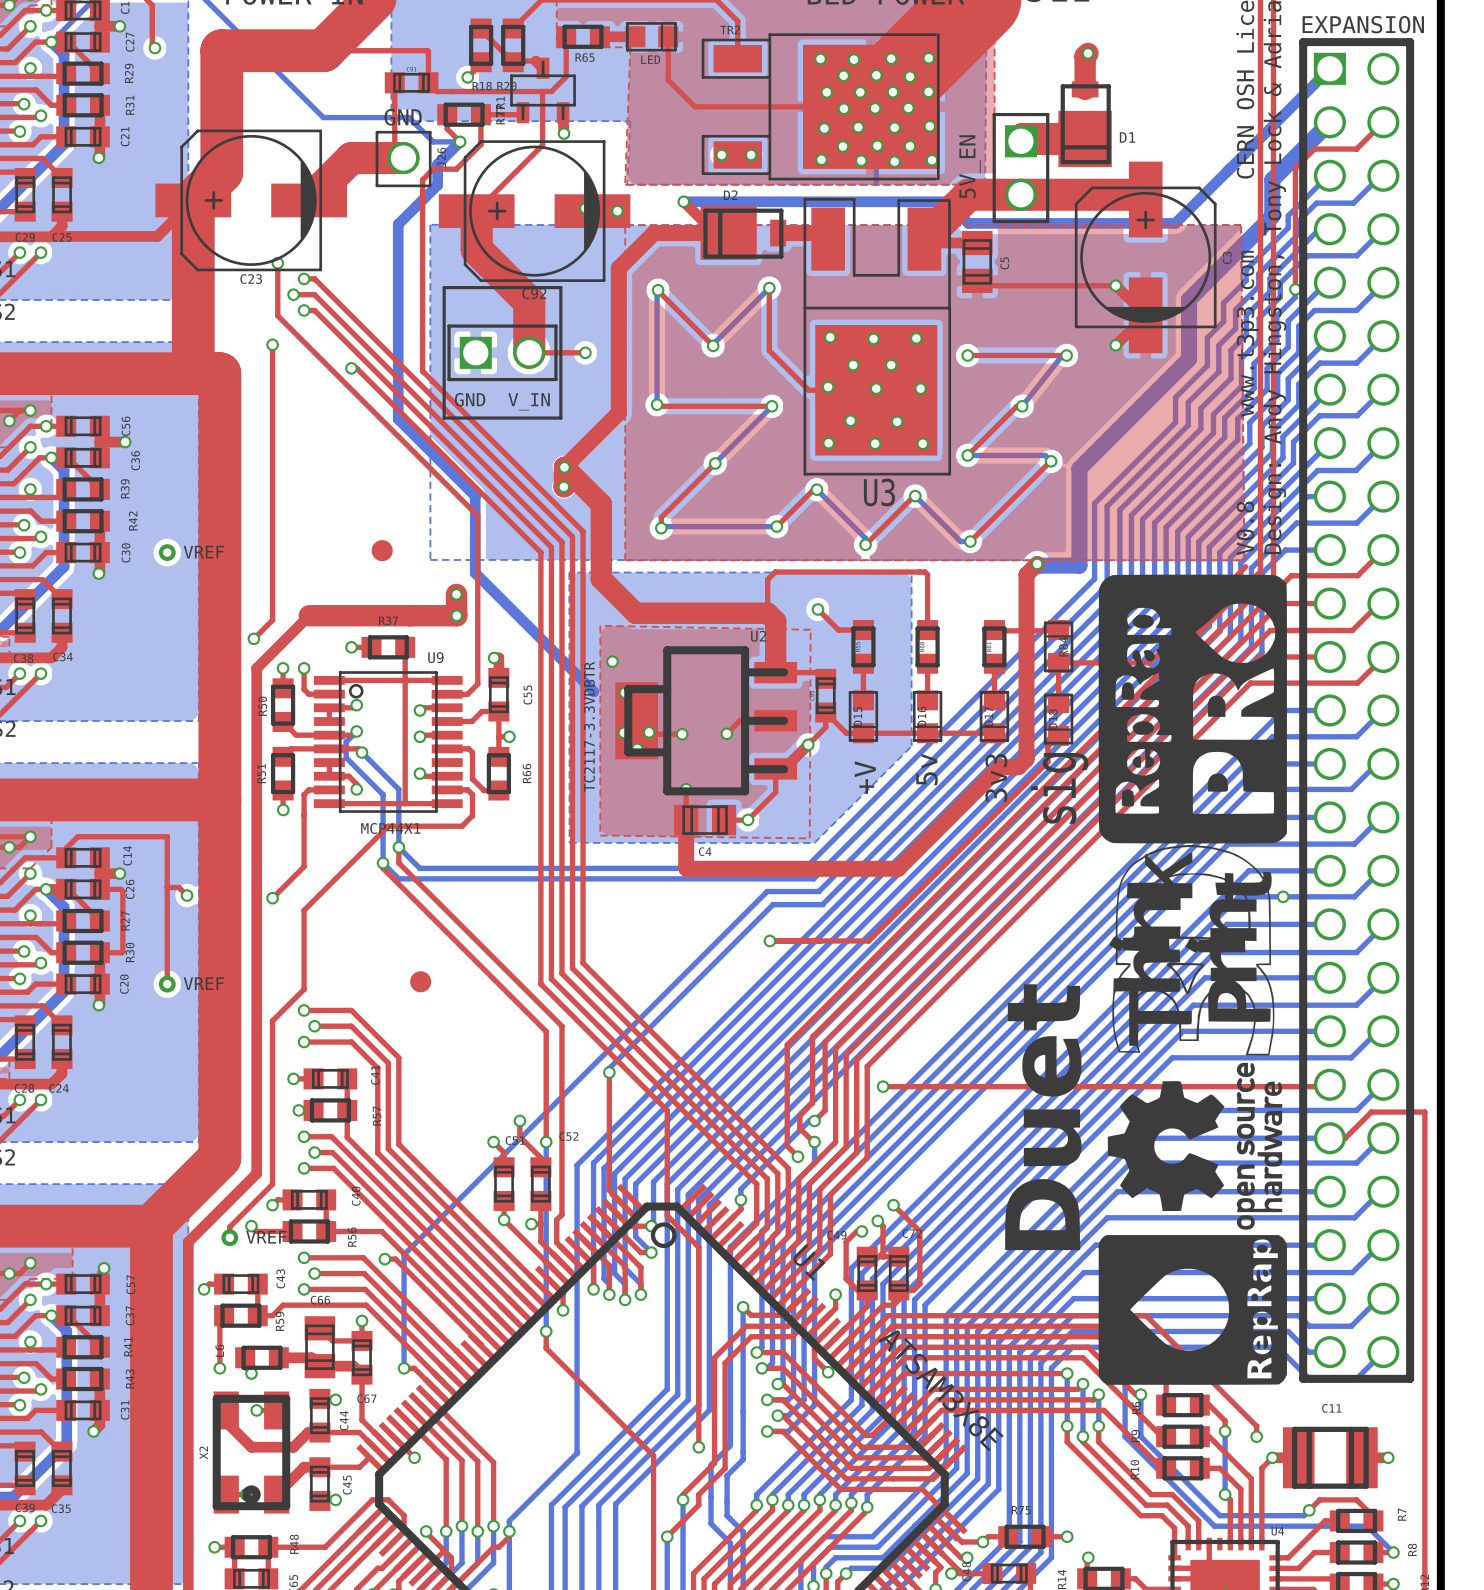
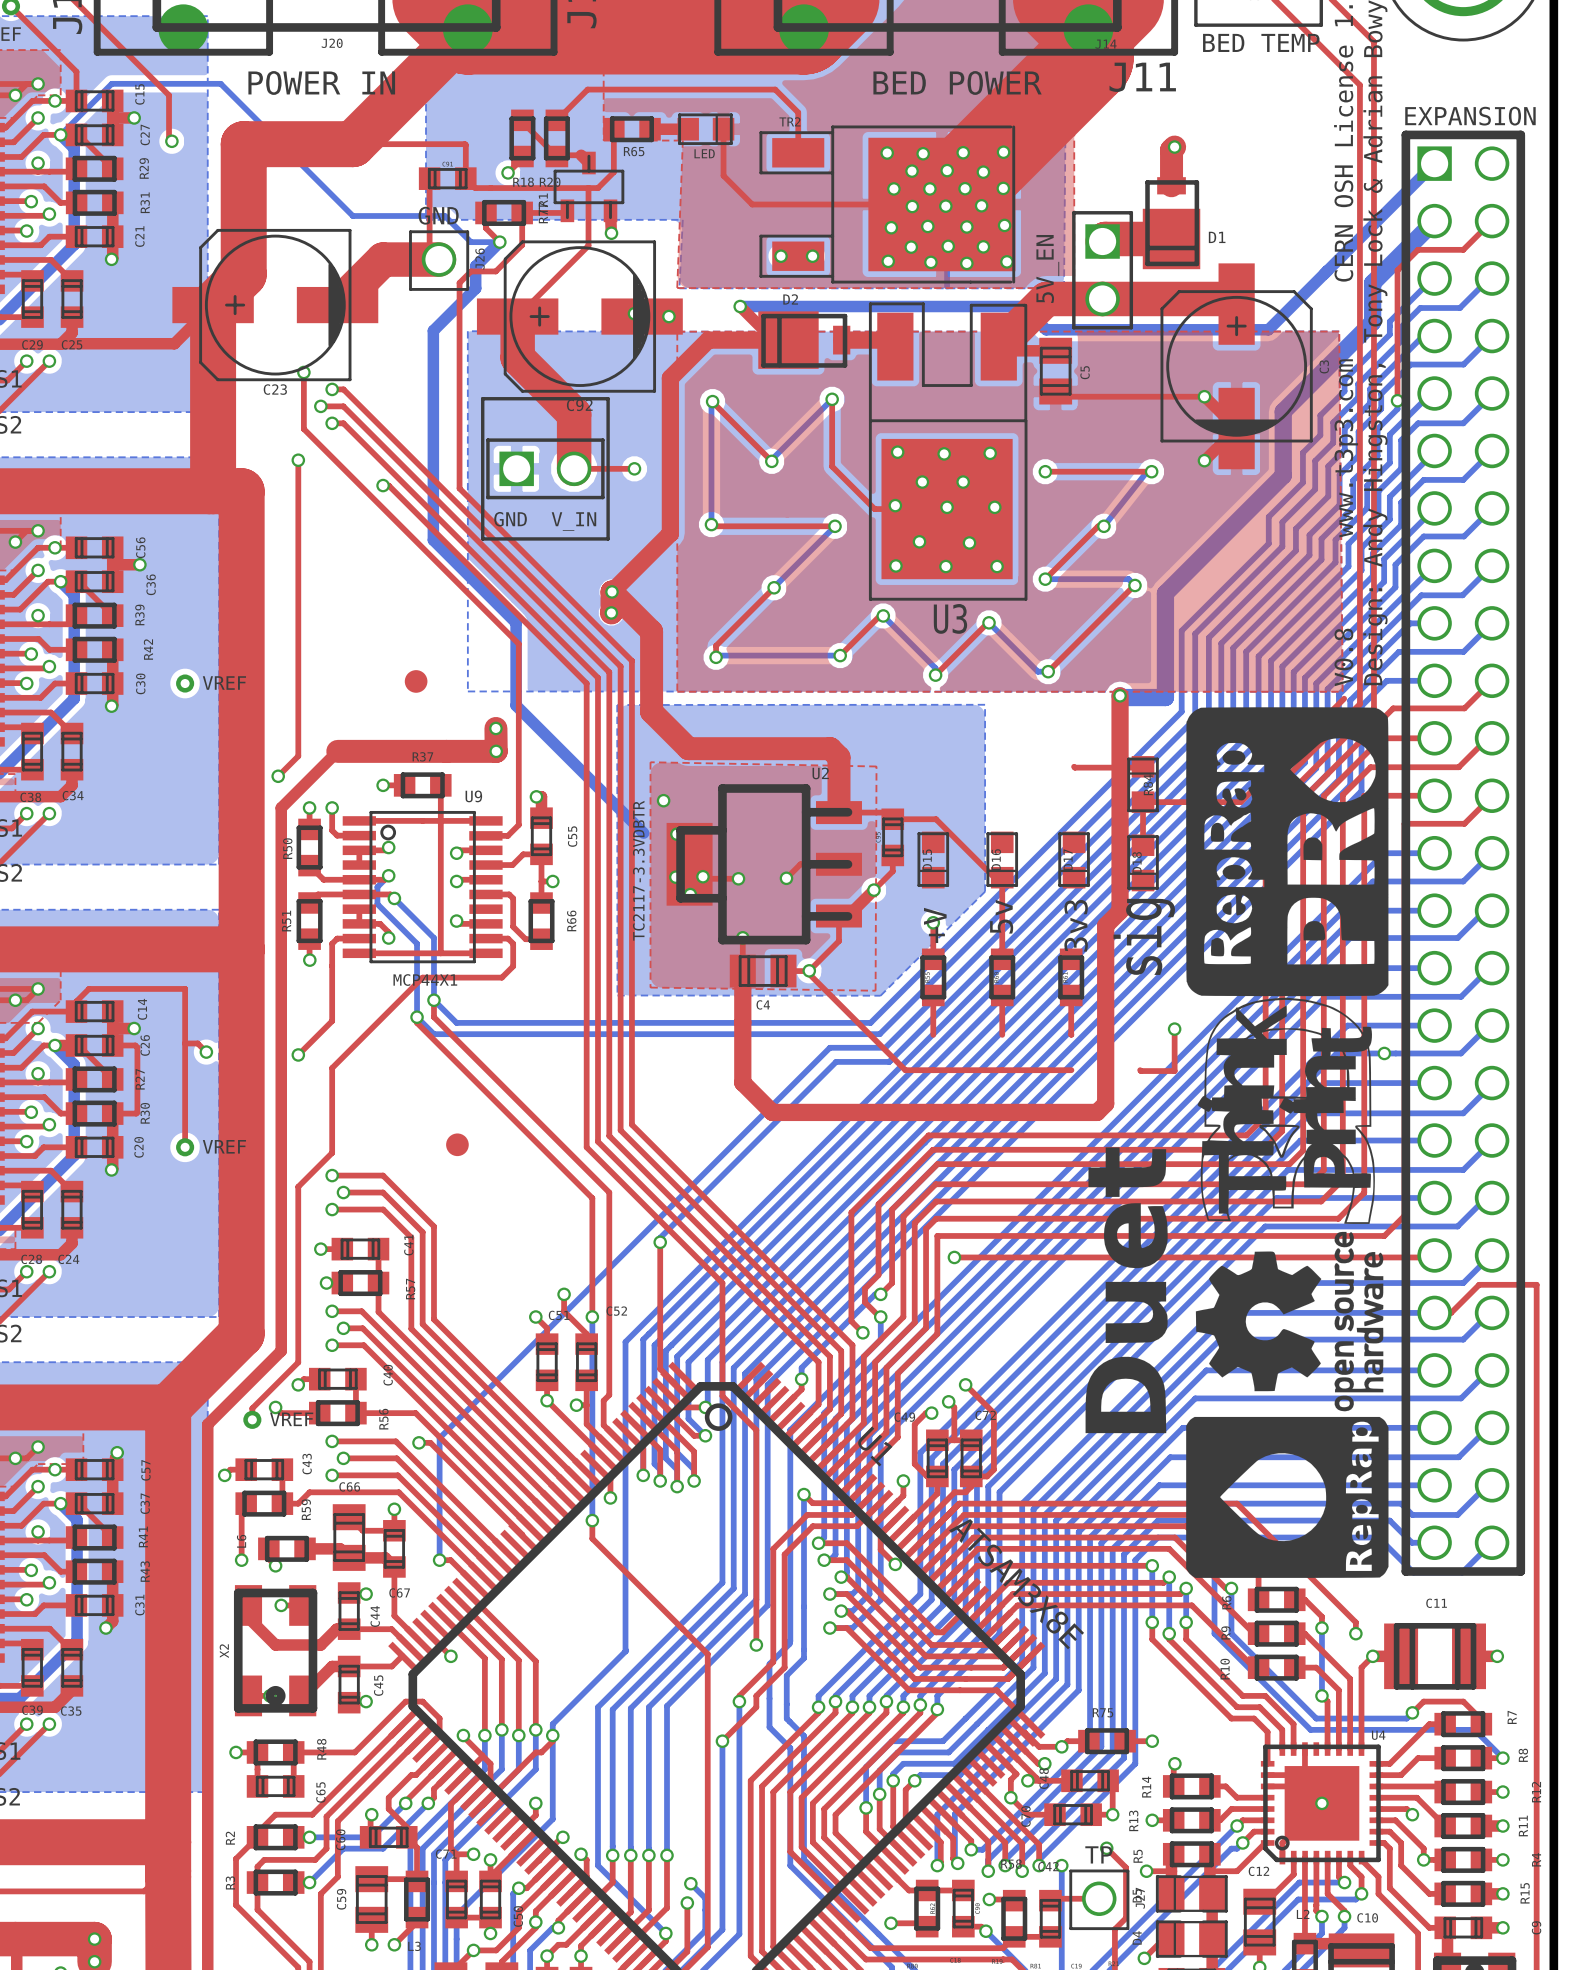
top track: (1037, 564) (1026, 574) (1026, 759) (1018, 767) (999, 767) (898, 868) (686, 867) -> (1120, 695) (1120, 911) (1105, 925) (1105, 1103) (1097, 1112) (772, 1112) (742, 1082) (742, 1022)
top track: (817, 609) (838, 630) (863, 630) -> none
via: (817, 609) -> none
top track: (767, 613) (767, 579) (775, 572) (924, 572) (927, 574) (927, 630) -> none
part position: (863, 646) -> (933, 977)
part position: (927, 646) -> (1002, 977)
part position: (994, 646) -> (1071, 977)
top track: (1244, 656) (866, 1034) -> (1342, 795) (1342, 1179) (1321, 1201) (936, 1201)
top track: (1226, 657) (865, 1018) -> (1323, 796) (1323, 1170) (1309, 1184) (935, 1184)
top track: (1264, 657) (1259, 657) (866, 1050) -> (1364, 795) (1364, 1192) (1338, 1218) (936, 1218)
top track: (1172, 659) (859, 973) -> (1265, 798) (1265, 1116) (1246, 1135) (928, 1135)
top track: (1207, 659) (867, 999) -> (1303, 798) (1303, 1150) (1289, 1164) (937, 1164)
top track: (1188, 661) (863, 986) -> (1282, 800) (1282, 1131) (1263, 1149) (932, 1149)
top track: (863, 663) (863, 700) -> (933, 995) (933, 1034)
top track: (927, 663) (927, 700) -> (1002, 995) (1002, 1034)
top track: (994, 663) (994, 700) -> (1071, 995) (1071, 1034)
top track: none -> (892, 819) (936, 819) (1002, 885) (1002, 959)
top track: (1301, 683) (1250, 683) (867, 1066) -> (1404, 823) (1404, 1215) (1384, 1235) (937, 1235)
top track: (826, 713) (846, 733) (994, 733) -> none
top track: (1058, 735) (1047, 746) (1047, 761) (868, 940) (769, 940) -> none
top track: none -> (933, 922) (933, 959)
via: none -> (933, 922)
top track: none -> (809, 970) (809, 974) (905, 1070) (1071, 1070)
top track: none -> (1174, 1029) (1174, 1071) (1140, 1070)
via: none -> (1174, 1029)
via: (769, 940) -> none

